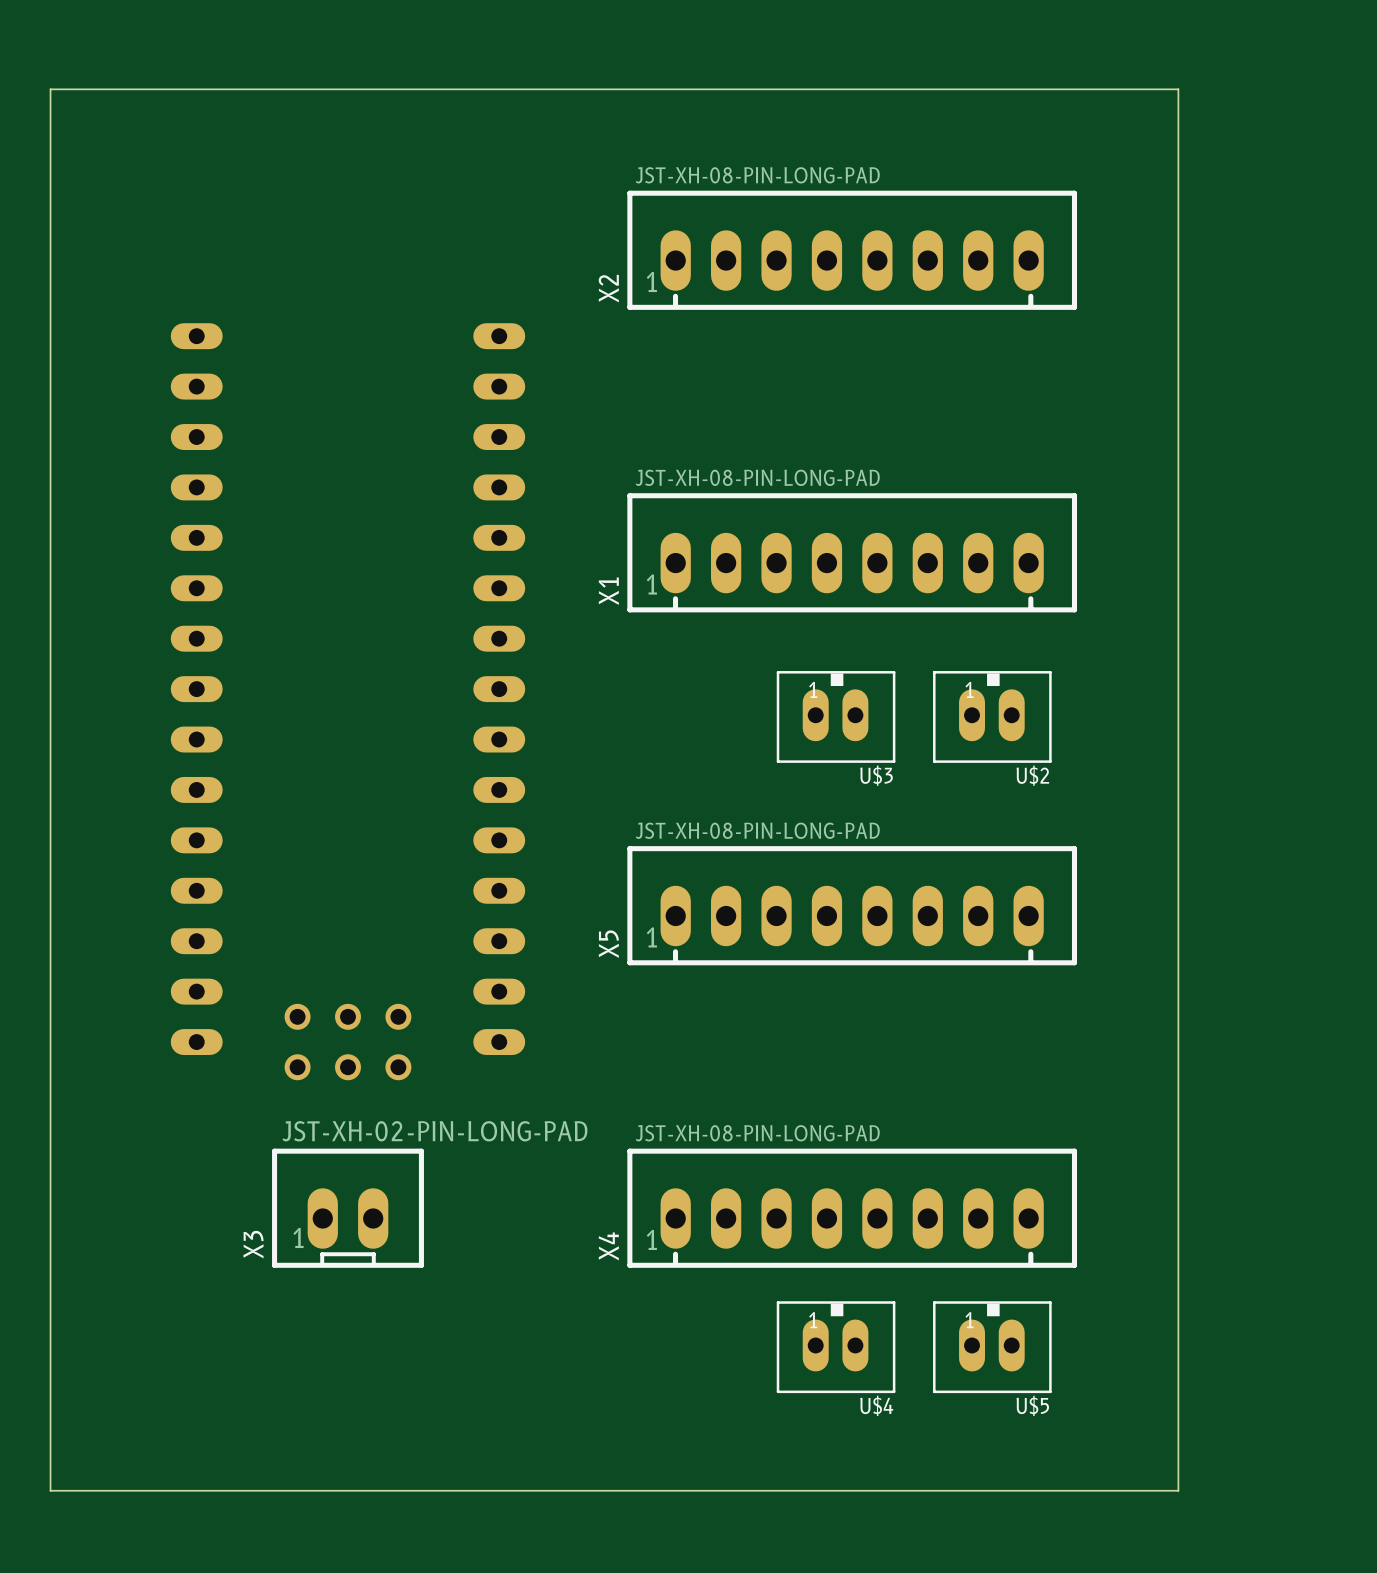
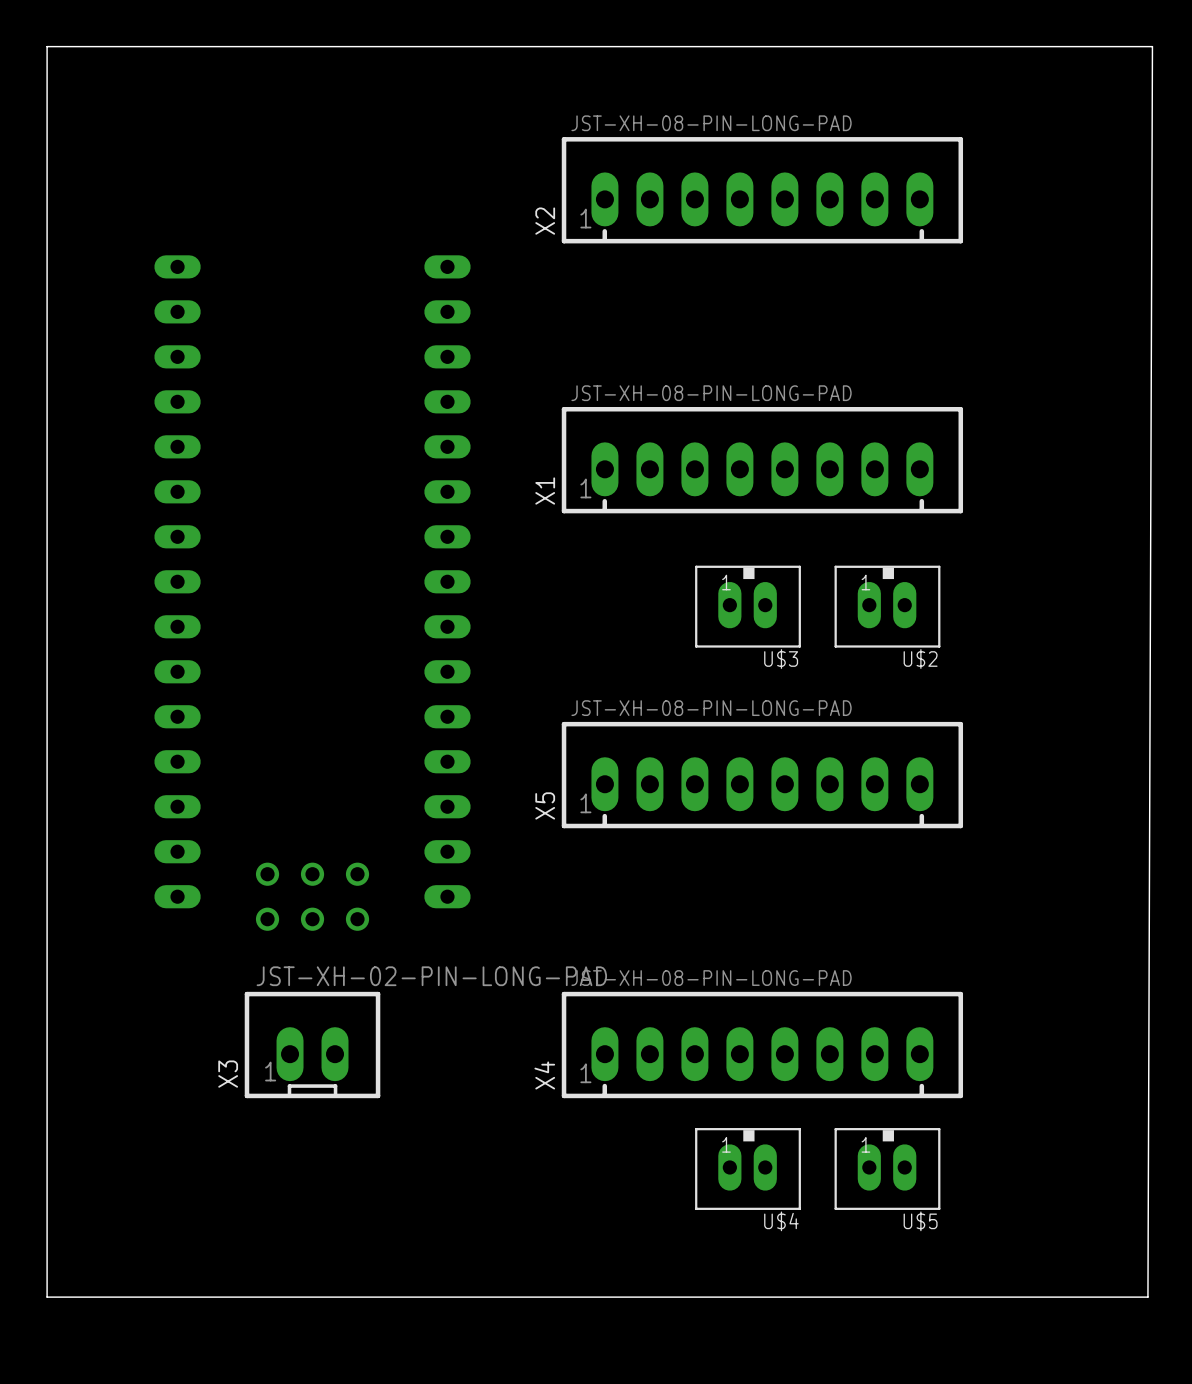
board edge: (1178, 89) (1178, 1490) -> (1053, 46) (1152, 46) (1147, 1297) (1053, 1297)

